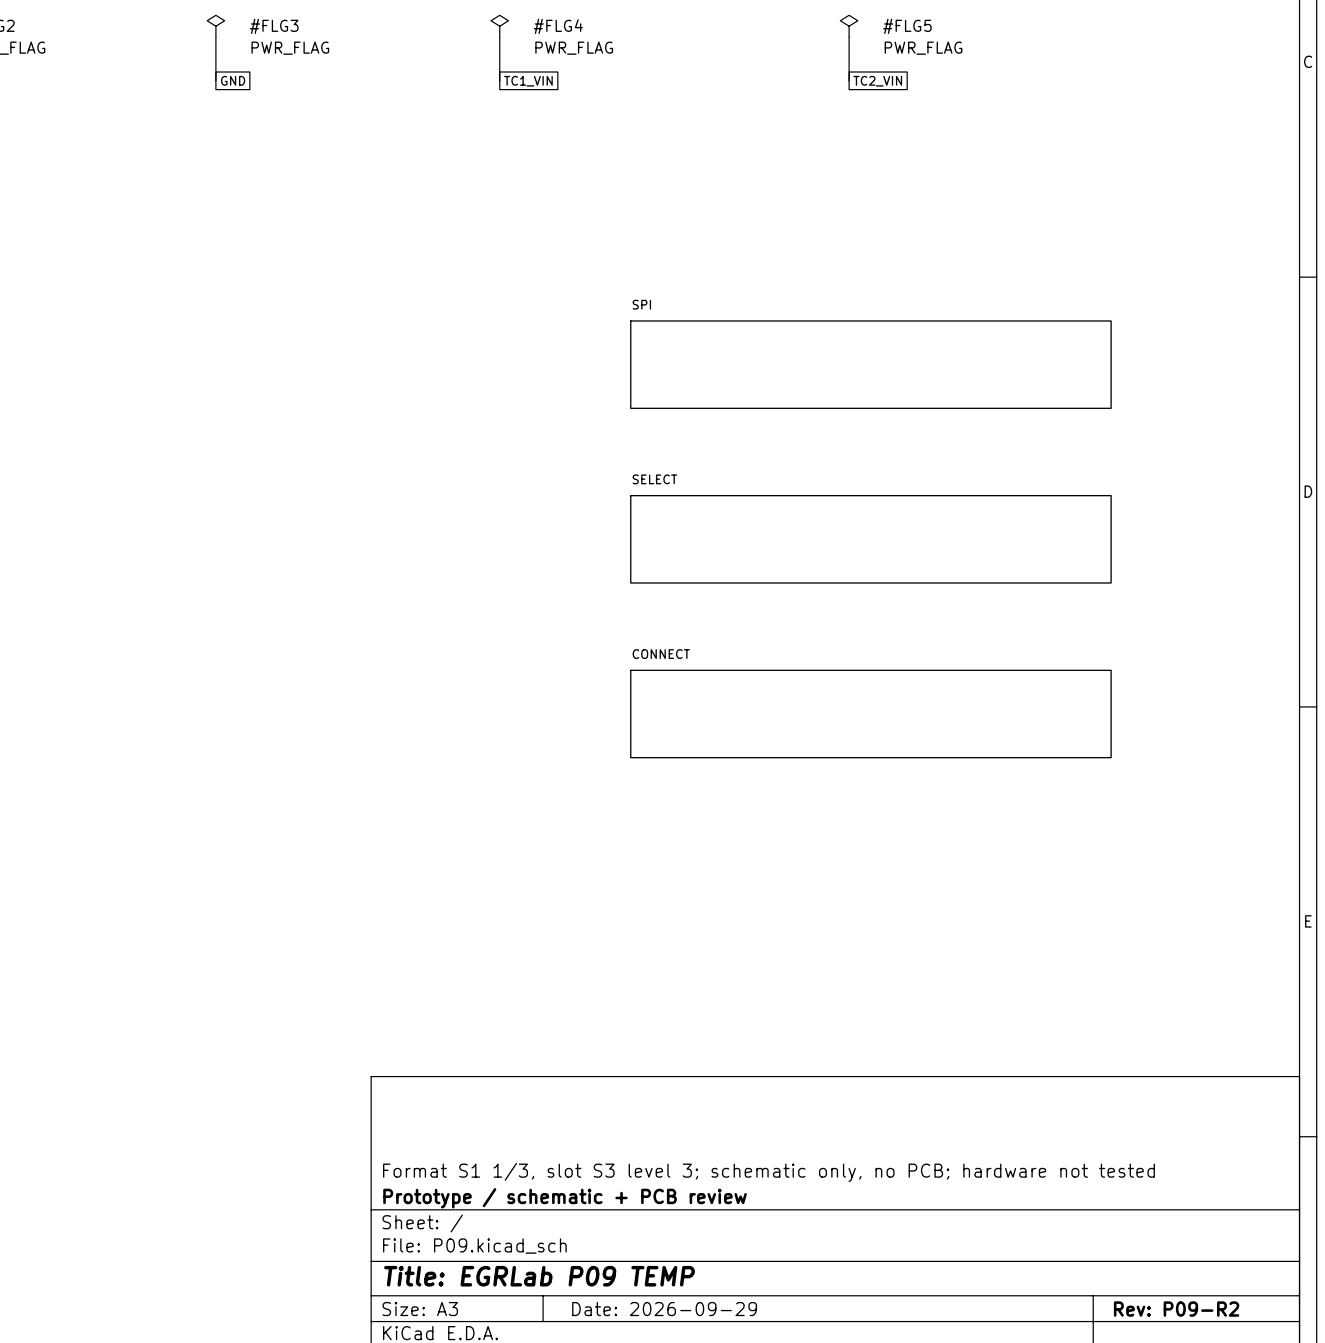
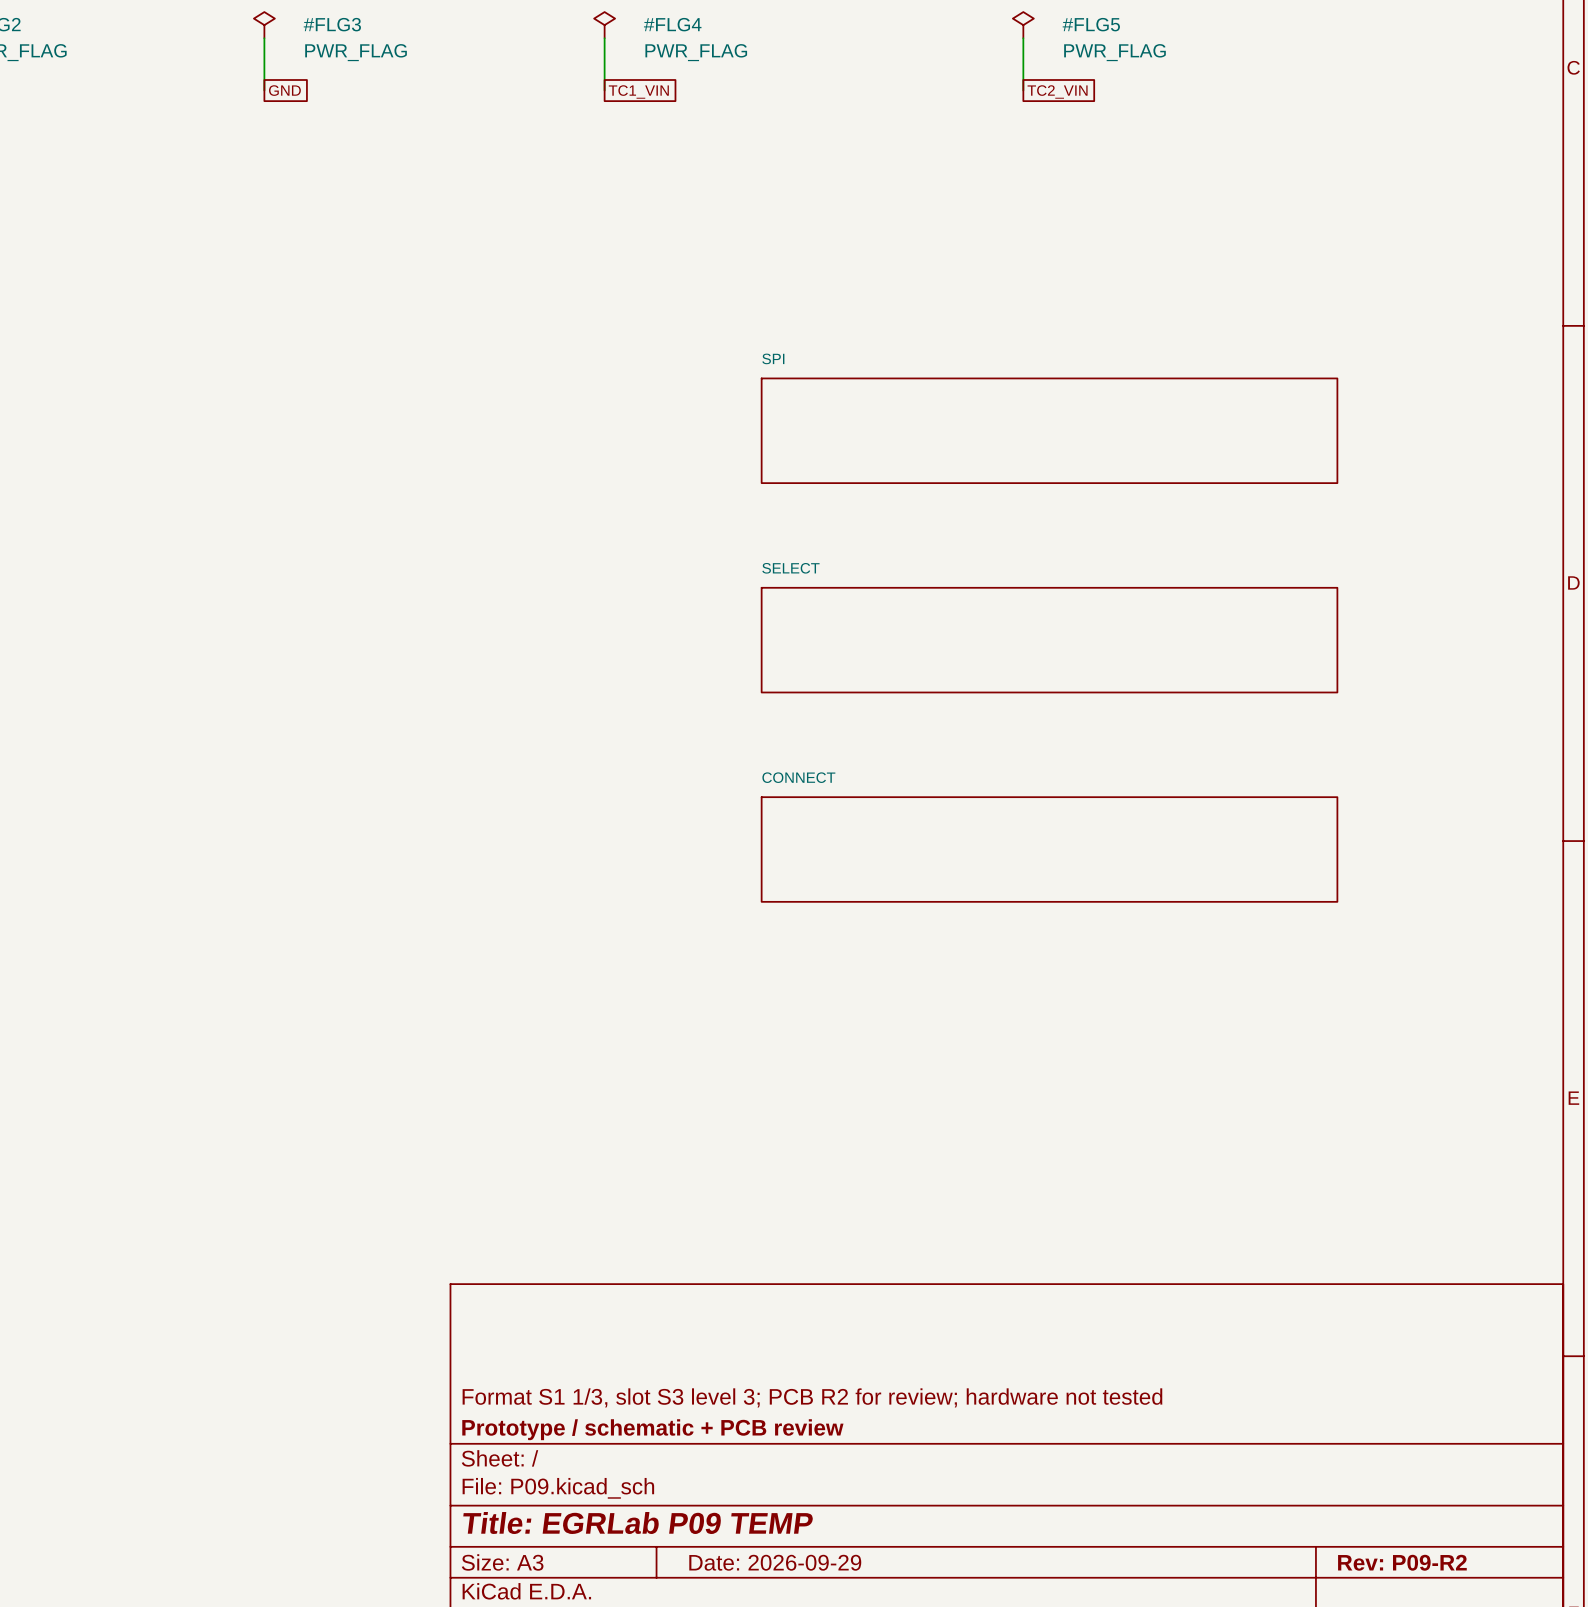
title block: Format S1 1/3, slot S3 level 3; schematic only, no PCB; hardware not tested (768, 1172) -> Format S1 1/3, slot S3 level 3; PCB R2 for review; hardware not tested (812, 1397)

